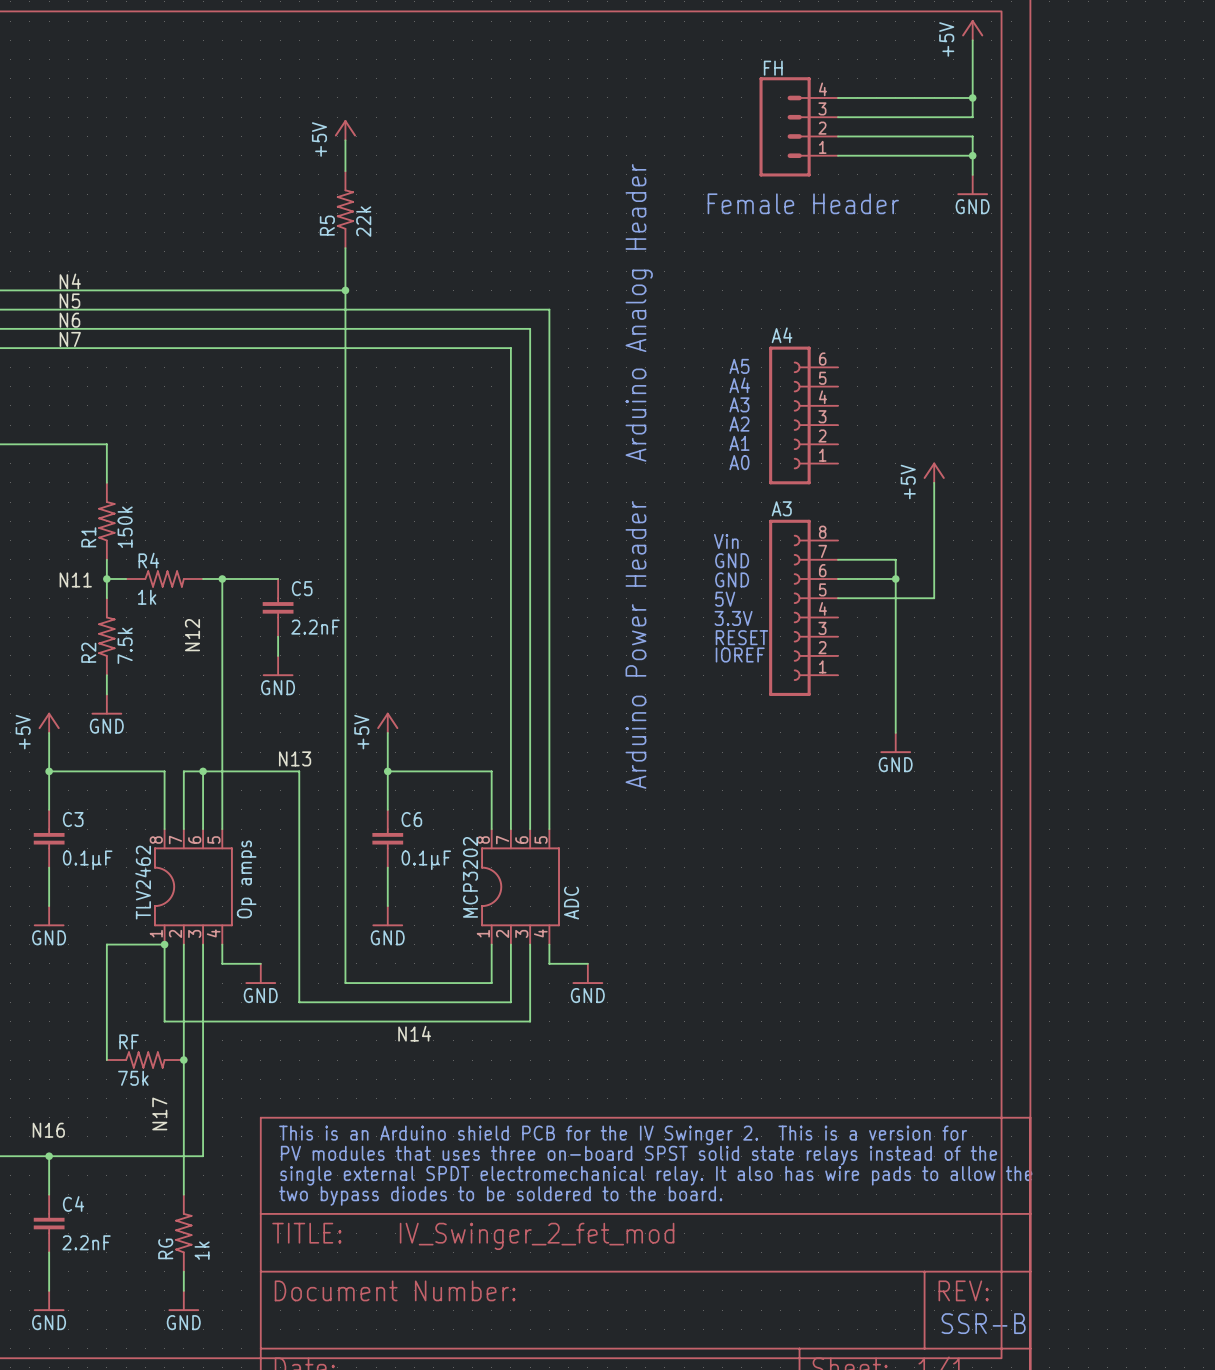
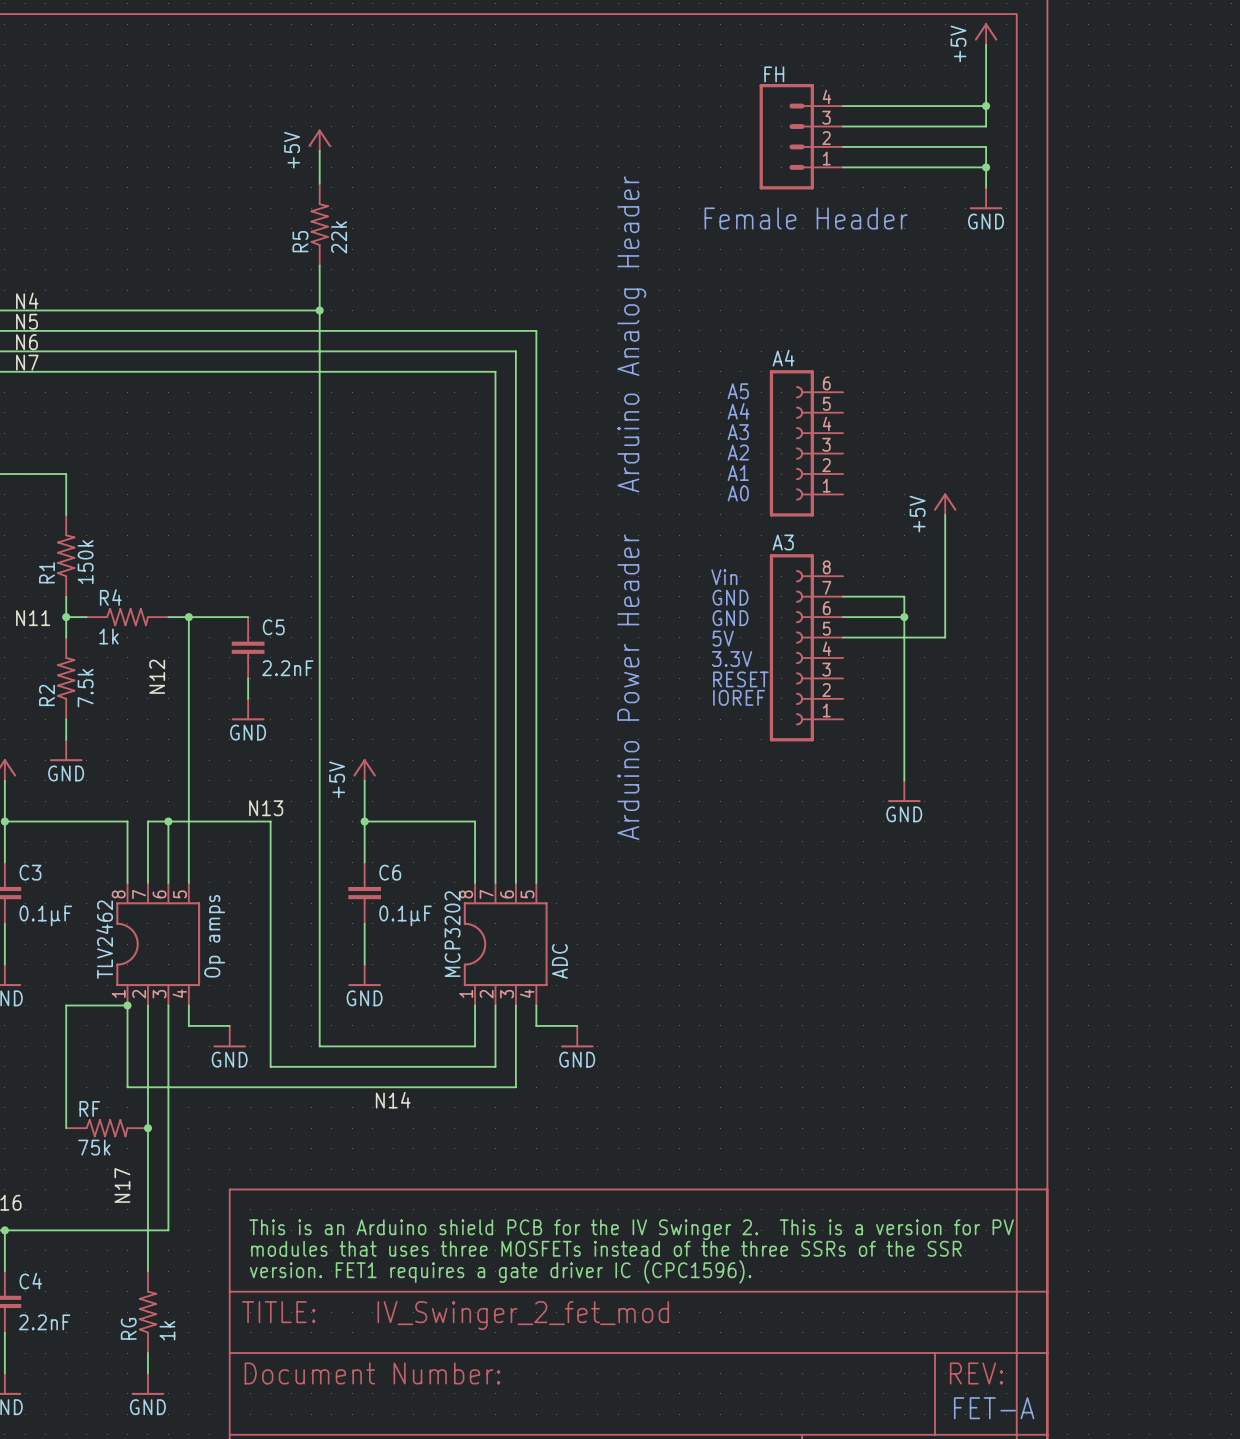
text: This is an Arduino shield PCB for the IV Swinger 2. This is a version for (623, 1135) -> none
text: PV modules that uses three on-board SPST solid state relays instead of the (638, 1155) -> This is an Arduino shield PCB for the IV Swinger 2. This is a version for PV (631, 1229)
text: single external SPDT electromechanical relay. It also has wire pads to allow the (656, 1175) -> modules that uses three MOSFETs instead of the three SSRs of the SSR (606, 1248)
text: two bypass diodes to be soldered to the board. (500, 1195) -> version. FET1 requires a gate driver IC (CPC1596). (500, 1271)
text: SSR-B (983, 1323) -> FET-A (994, 1408)

